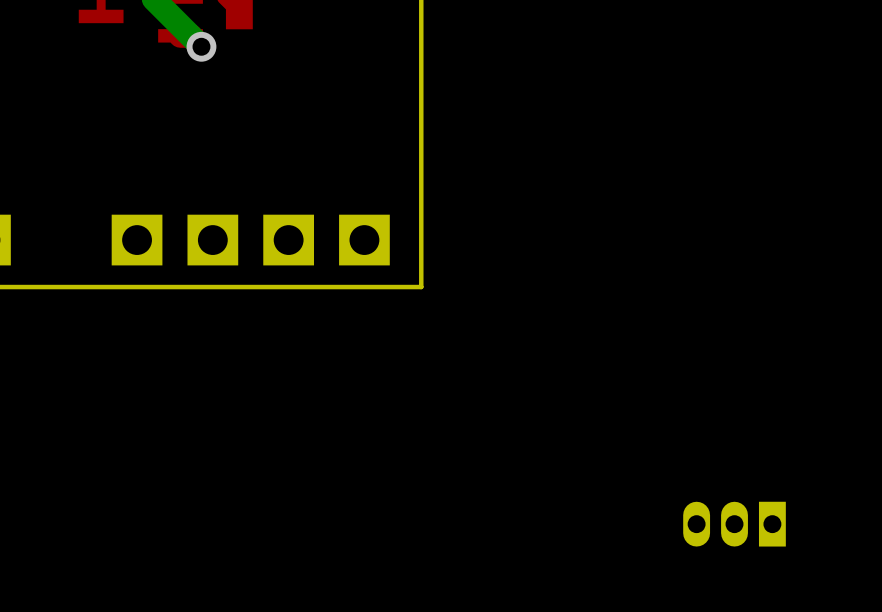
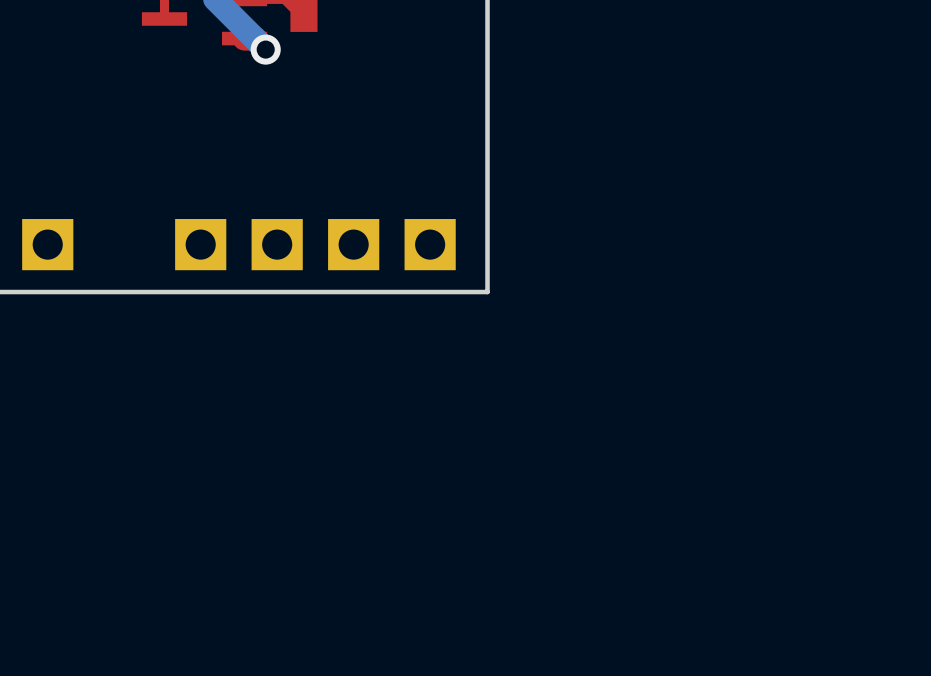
part: (734, 524) -> none

